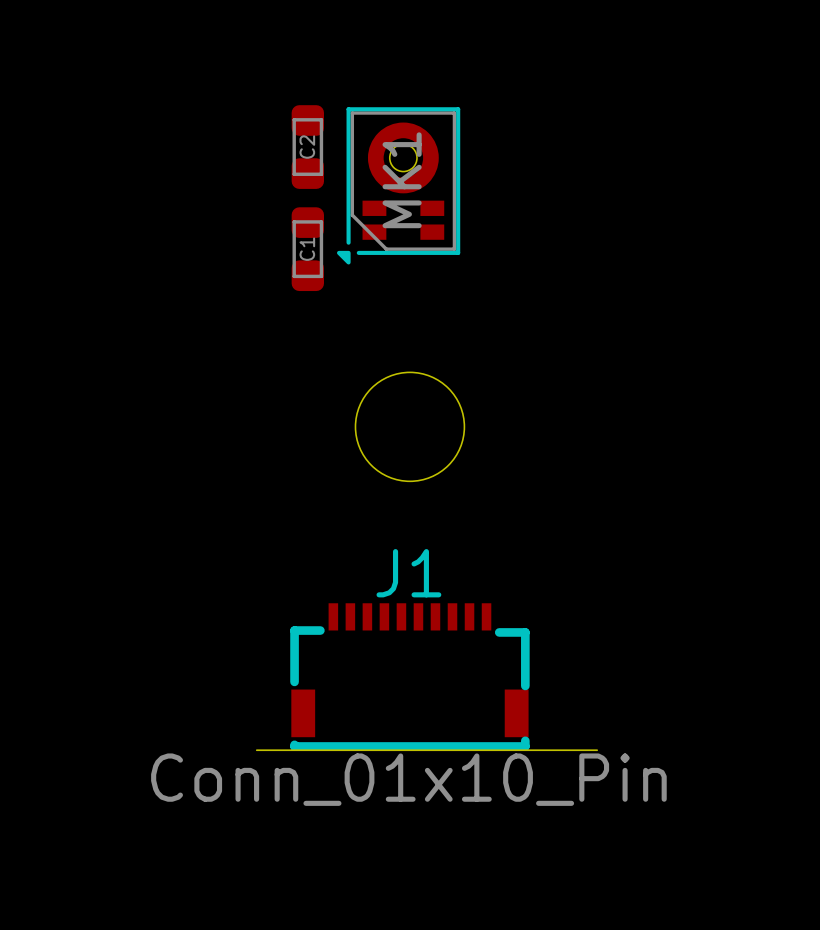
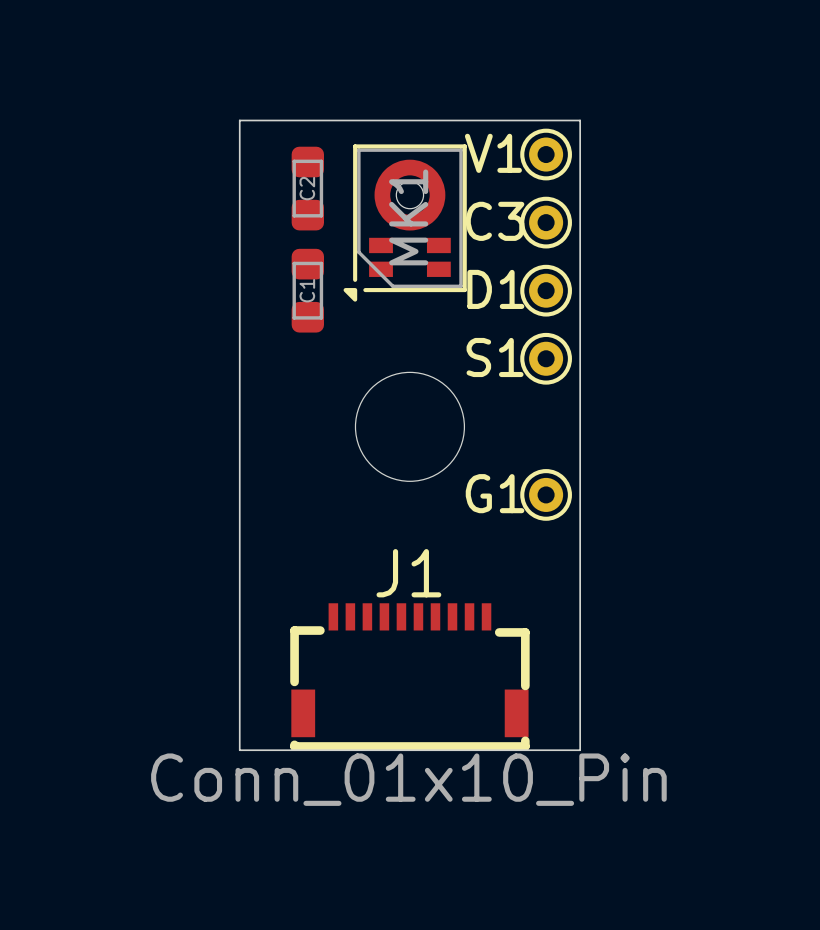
C2 position: (307, 147) -> (307, 188)
V1: none -> (546, 154)
MK1 position: (398, 185) -> (405, 223)
C3: none -> (546, 222)
C1 position: (307, 249) -> (307, 290)
D1: none -> (546, 290)
S1: none -> (546, 358)
G1: none -> (546, 494)
board edge: (580, 750) (597, 750) -> (580, 750) (580, 120) (239, 120) (239, 750) (256, 750)

